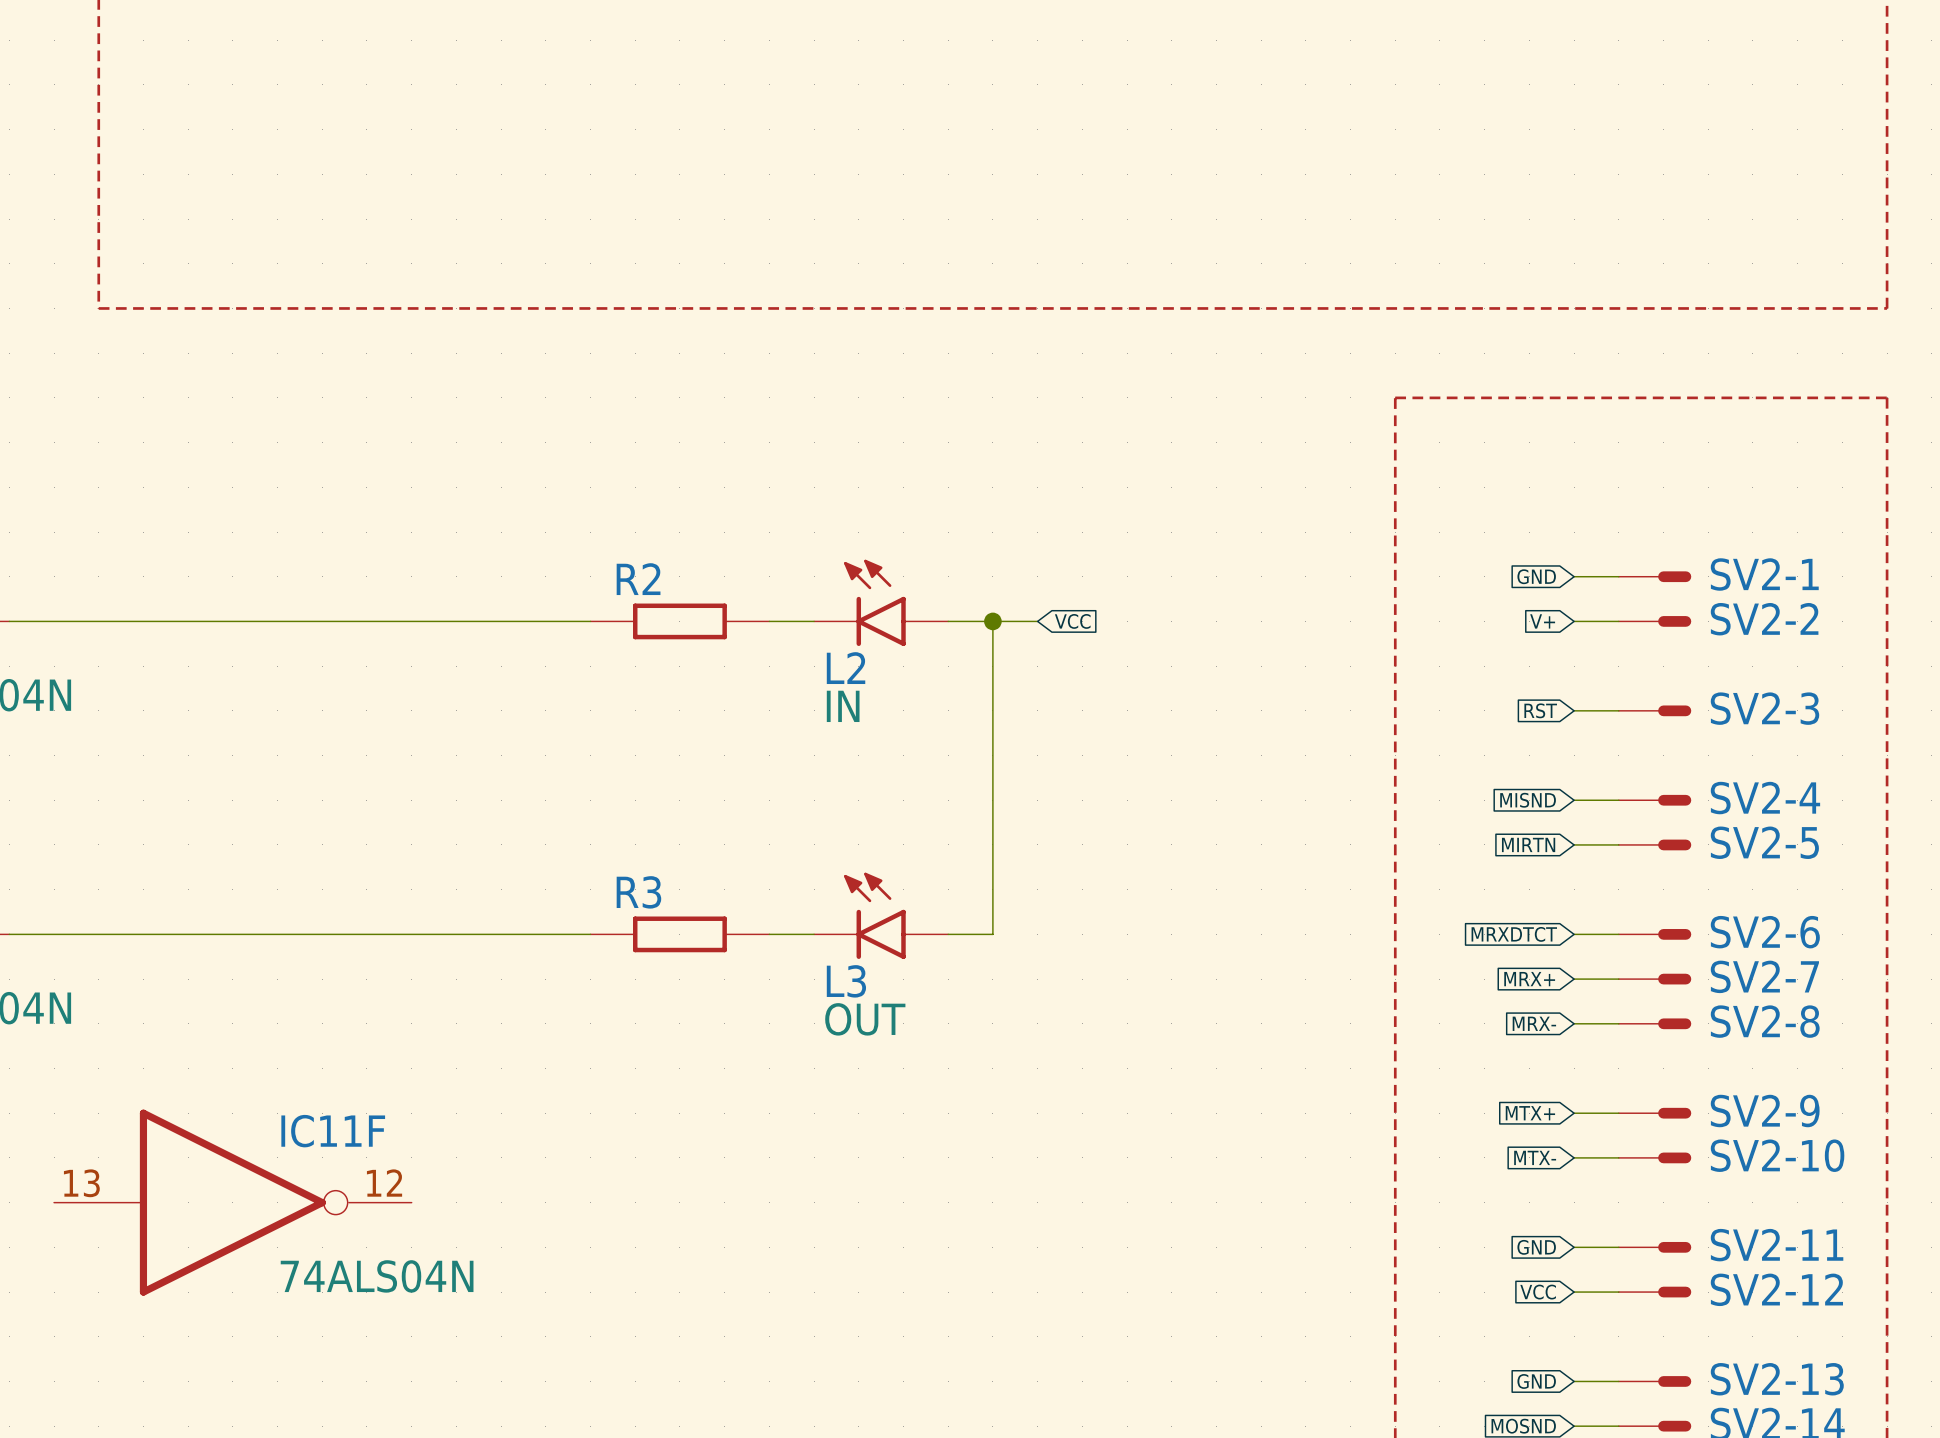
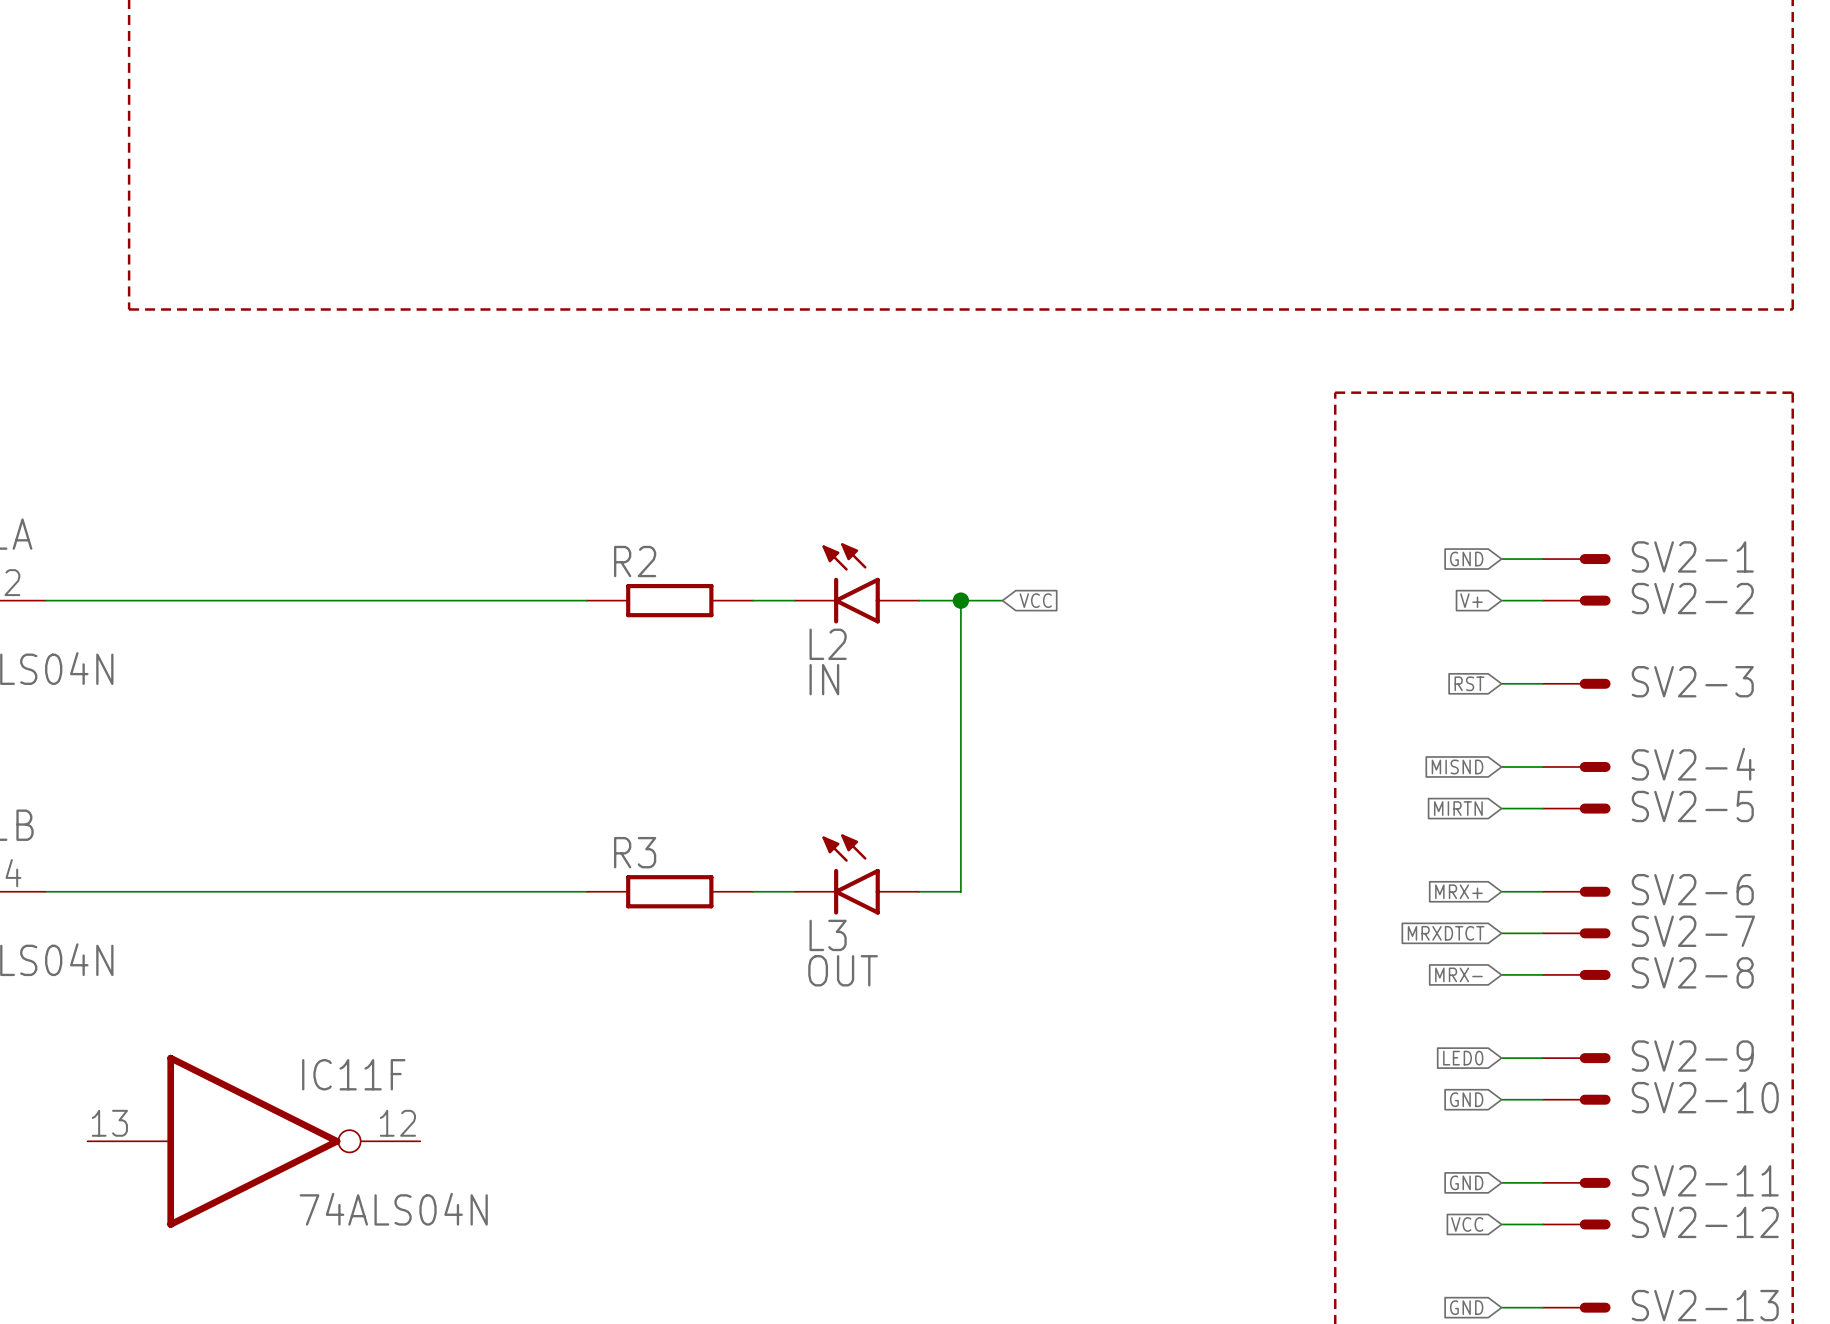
global label: MRXDTCT (1514, 934) -> MRX+ (1458, 891)
global label: MRX+ (1529, 979) -> MRXDTCT (1446, 933)
global label: MTX+ (1530, 1113) -> LED0 (1463, 1058)
global label: MTX- (1535, 1157) -> GND (1466, 1099)

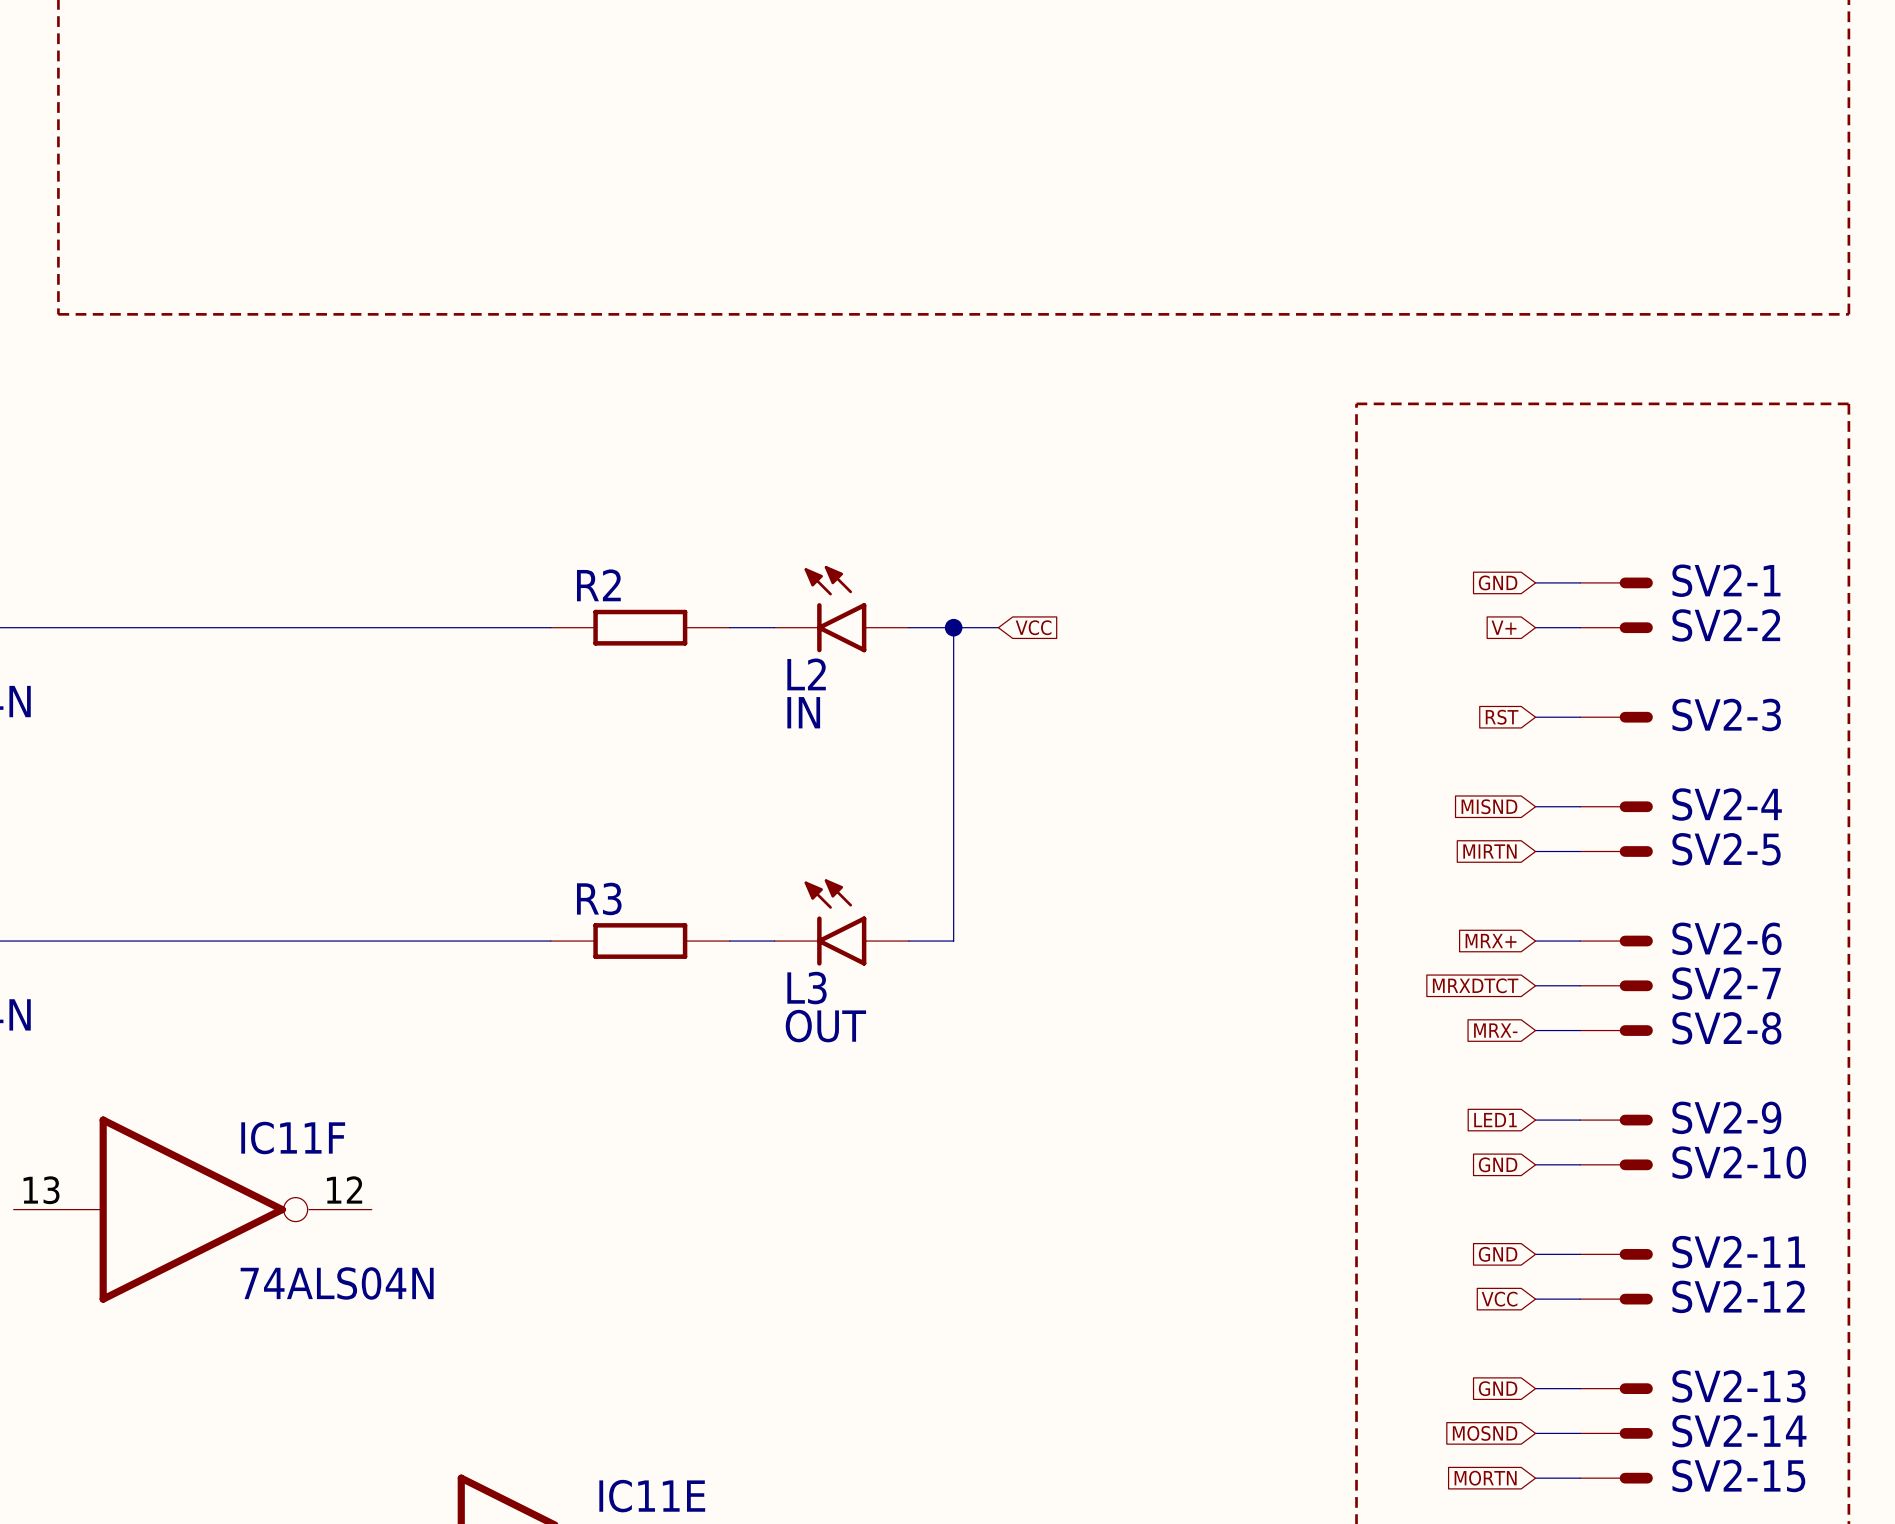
global label: LED0 (1463, 1058) -> LED1 (1495, 1120)

